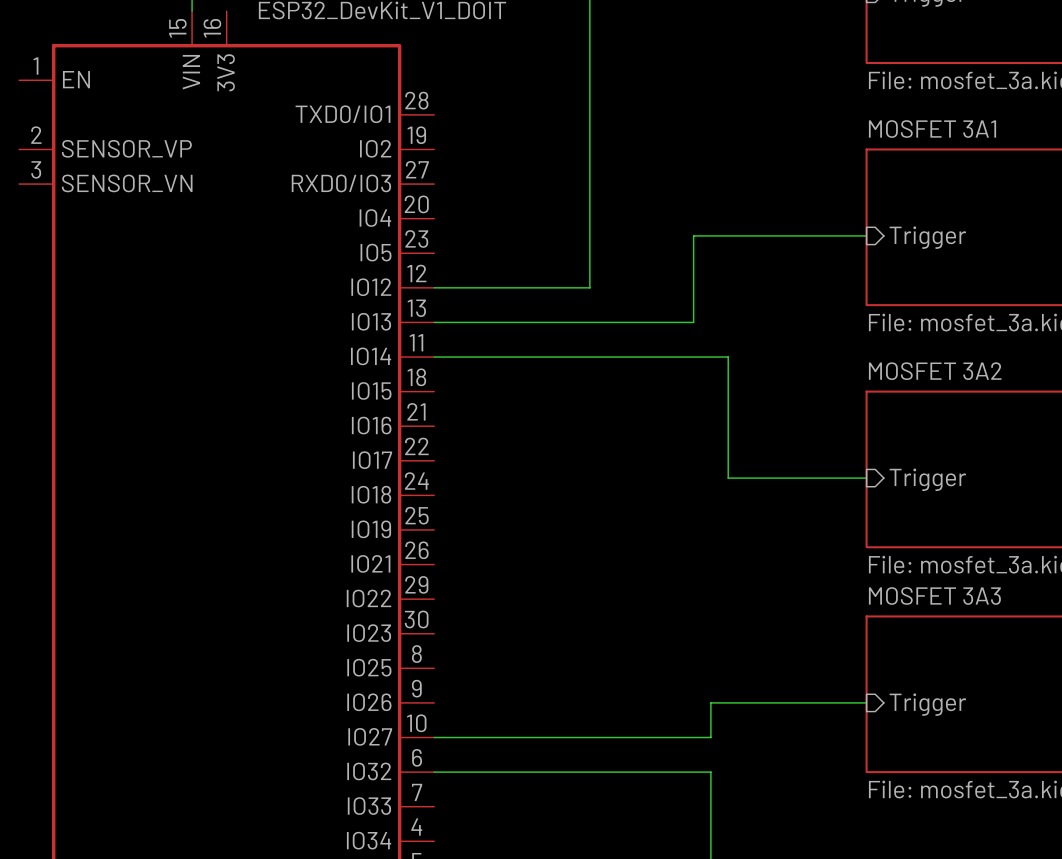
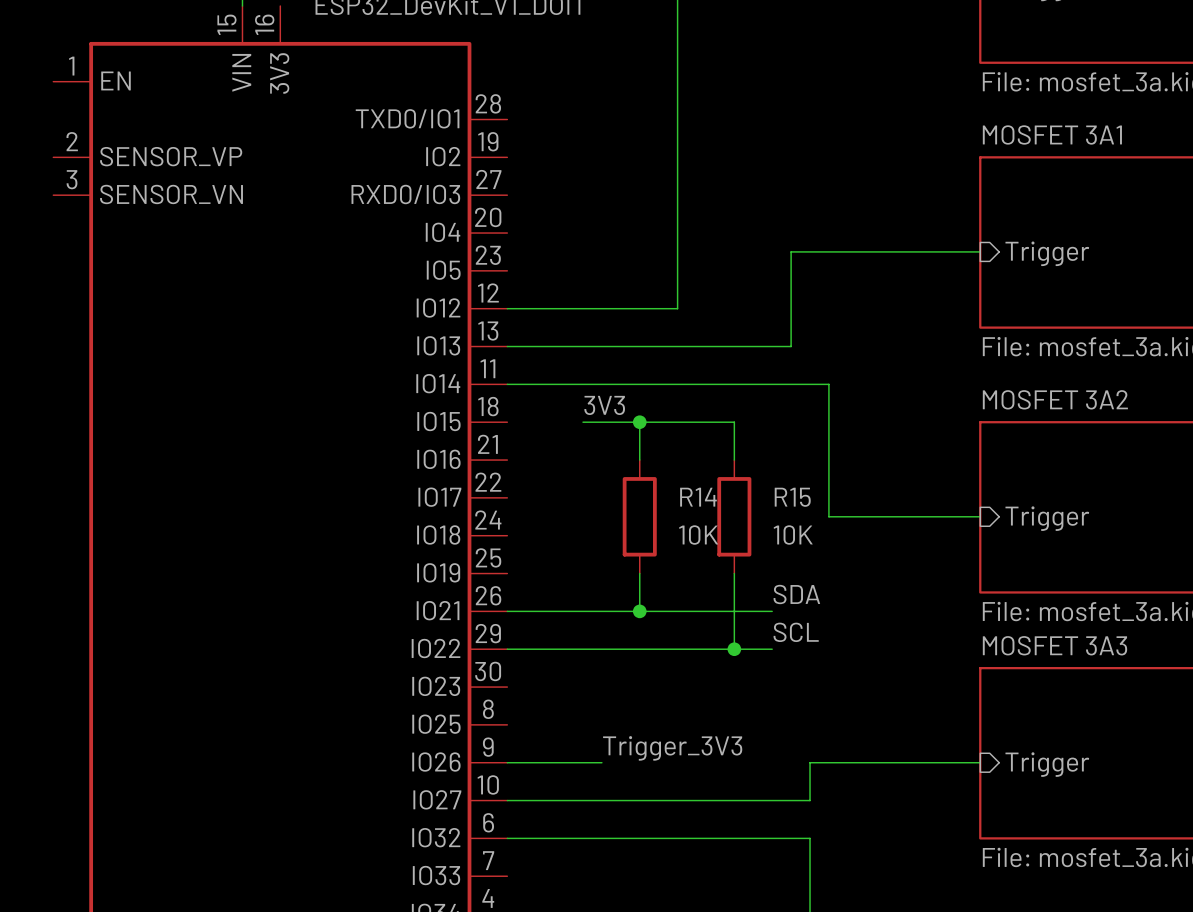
label: none -> 3V3 (604, 405)
wire: none -> (583, 422) (734, 422) (734, 460)
wire: none -> (639, 422) (639, 460)
junction: none -> (639, 422)
R14: none -> 10K (639, 516)
R15: none -> 10K (734, 516)
wire: none -> (639, 573) (639, 611)
wire: none -> (734, 573) (734, 649)
label: none -> SDA (796, 594)
wire: none -> (507, 611) (772, 611)
junction: none -> (639, 611)
label: none -> SCL (796, 632)
wire: none -> (507, 649) (772, 649)
junction: none -> (734, 649)
label: none -> Trigger_3V3 (672, 748)
wire: none -> (507, 762) (601, 762)

